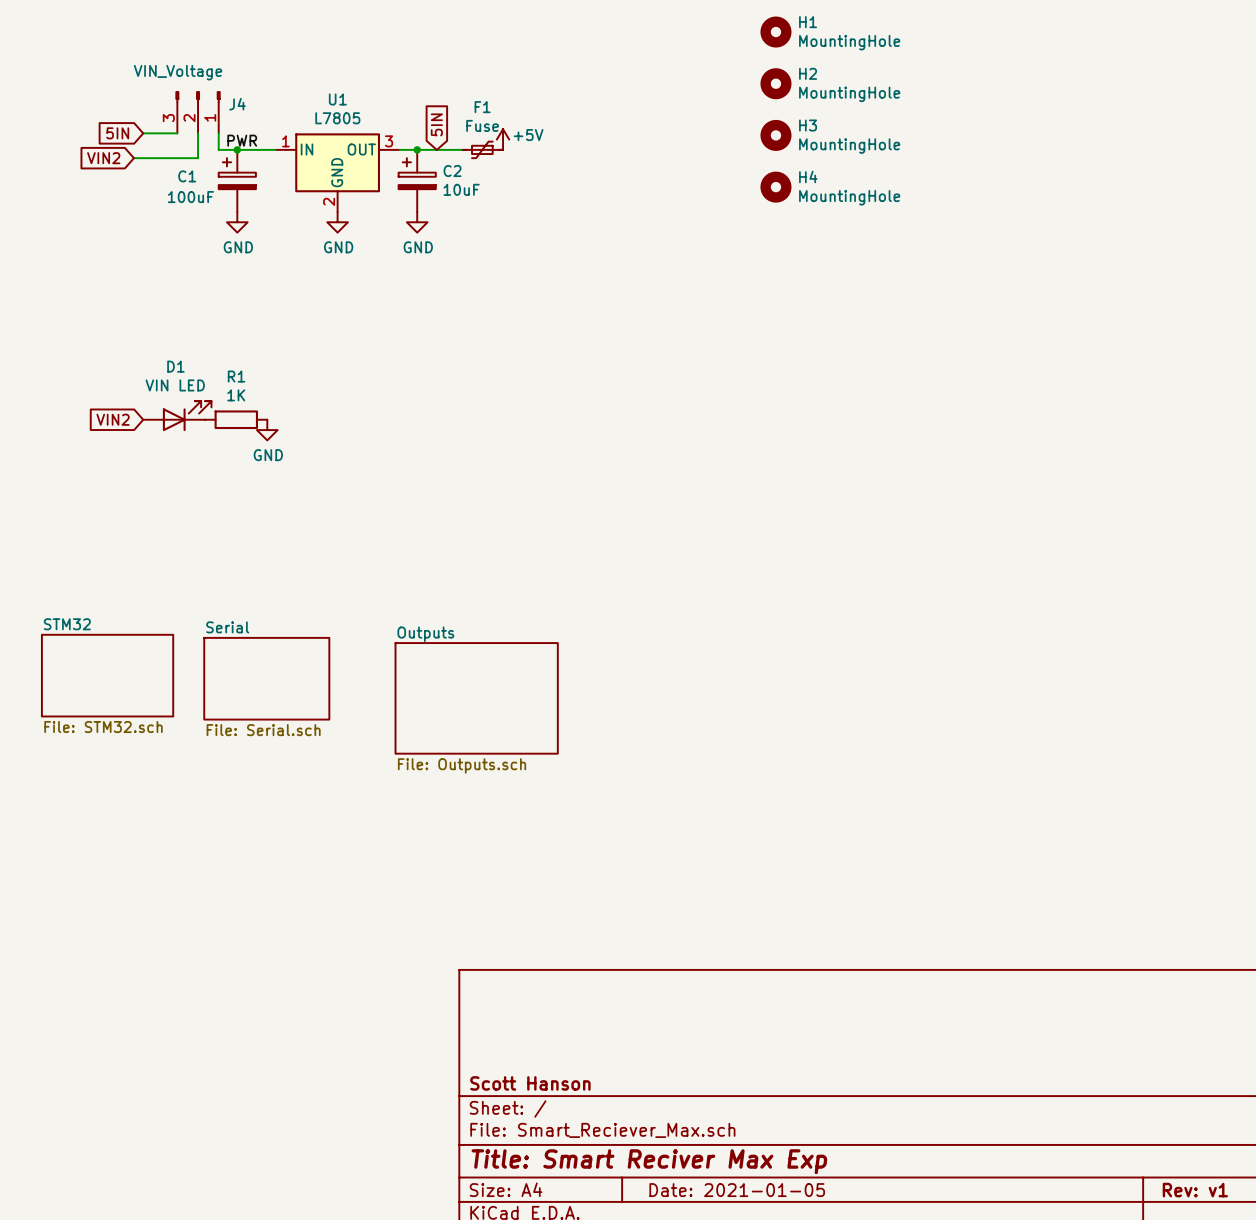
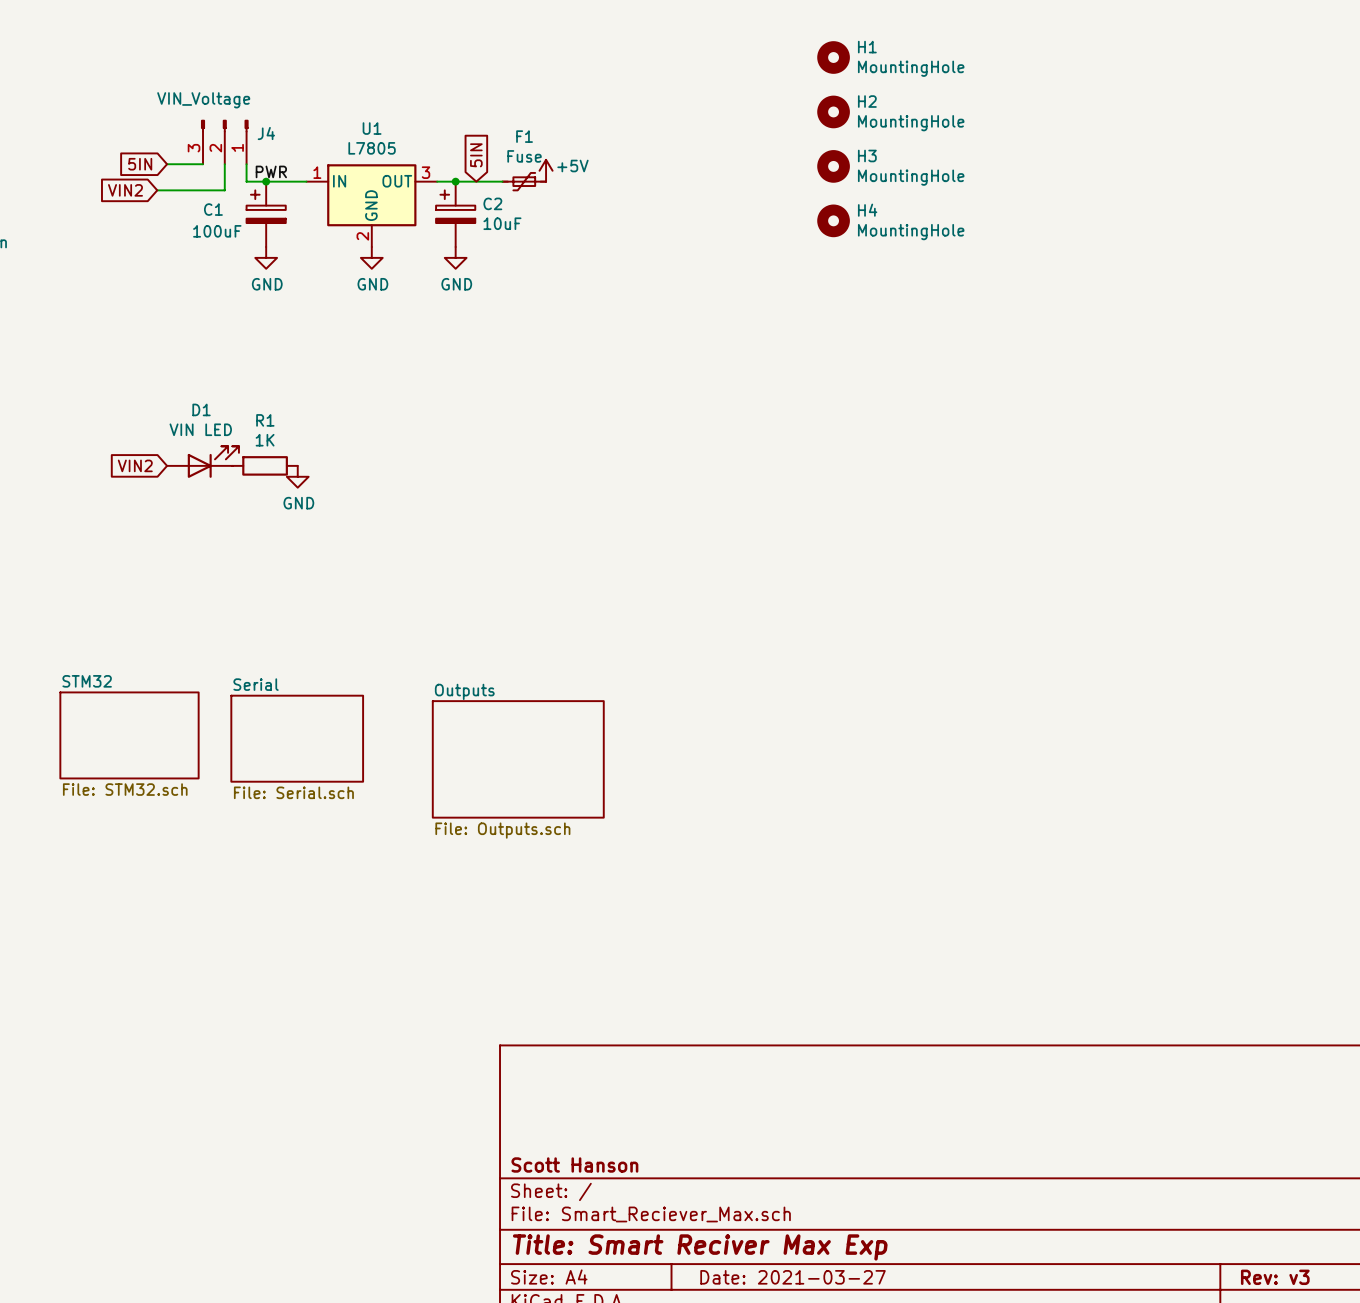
title block: Date: 2021-01-05 (737, 1190) -> Date: 2021-03-27 (793, 1277)
title block: Rev: v1 (1195, 1190) -> Rev: v3 (1275, 1277)

